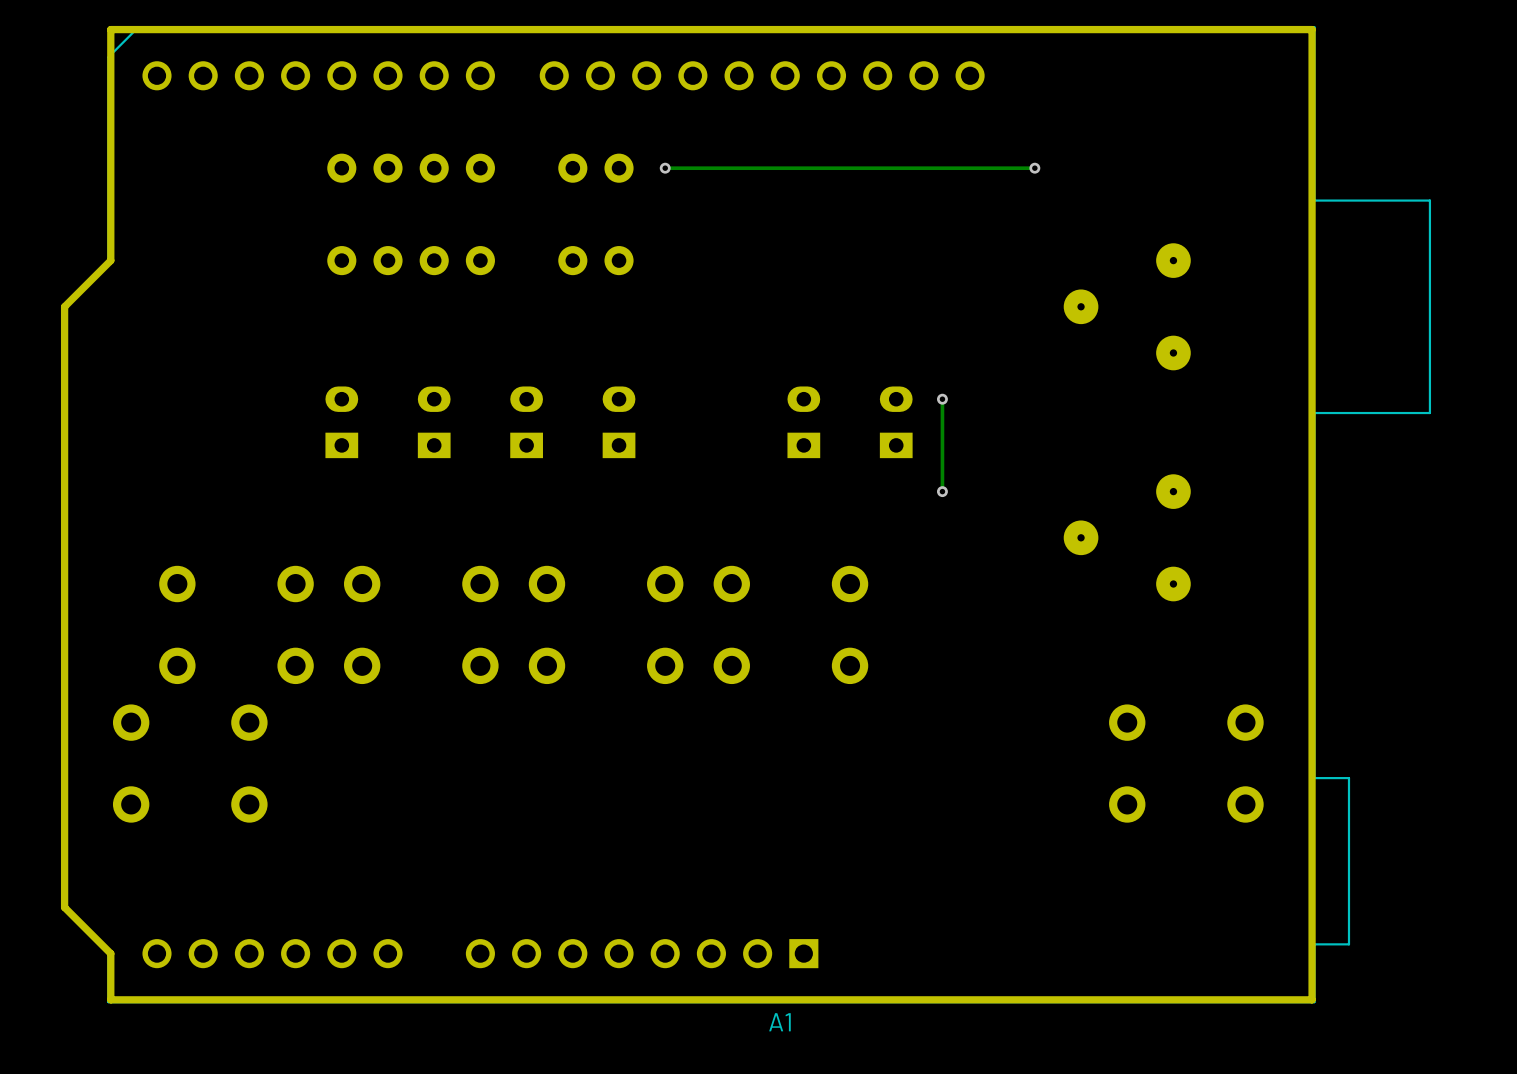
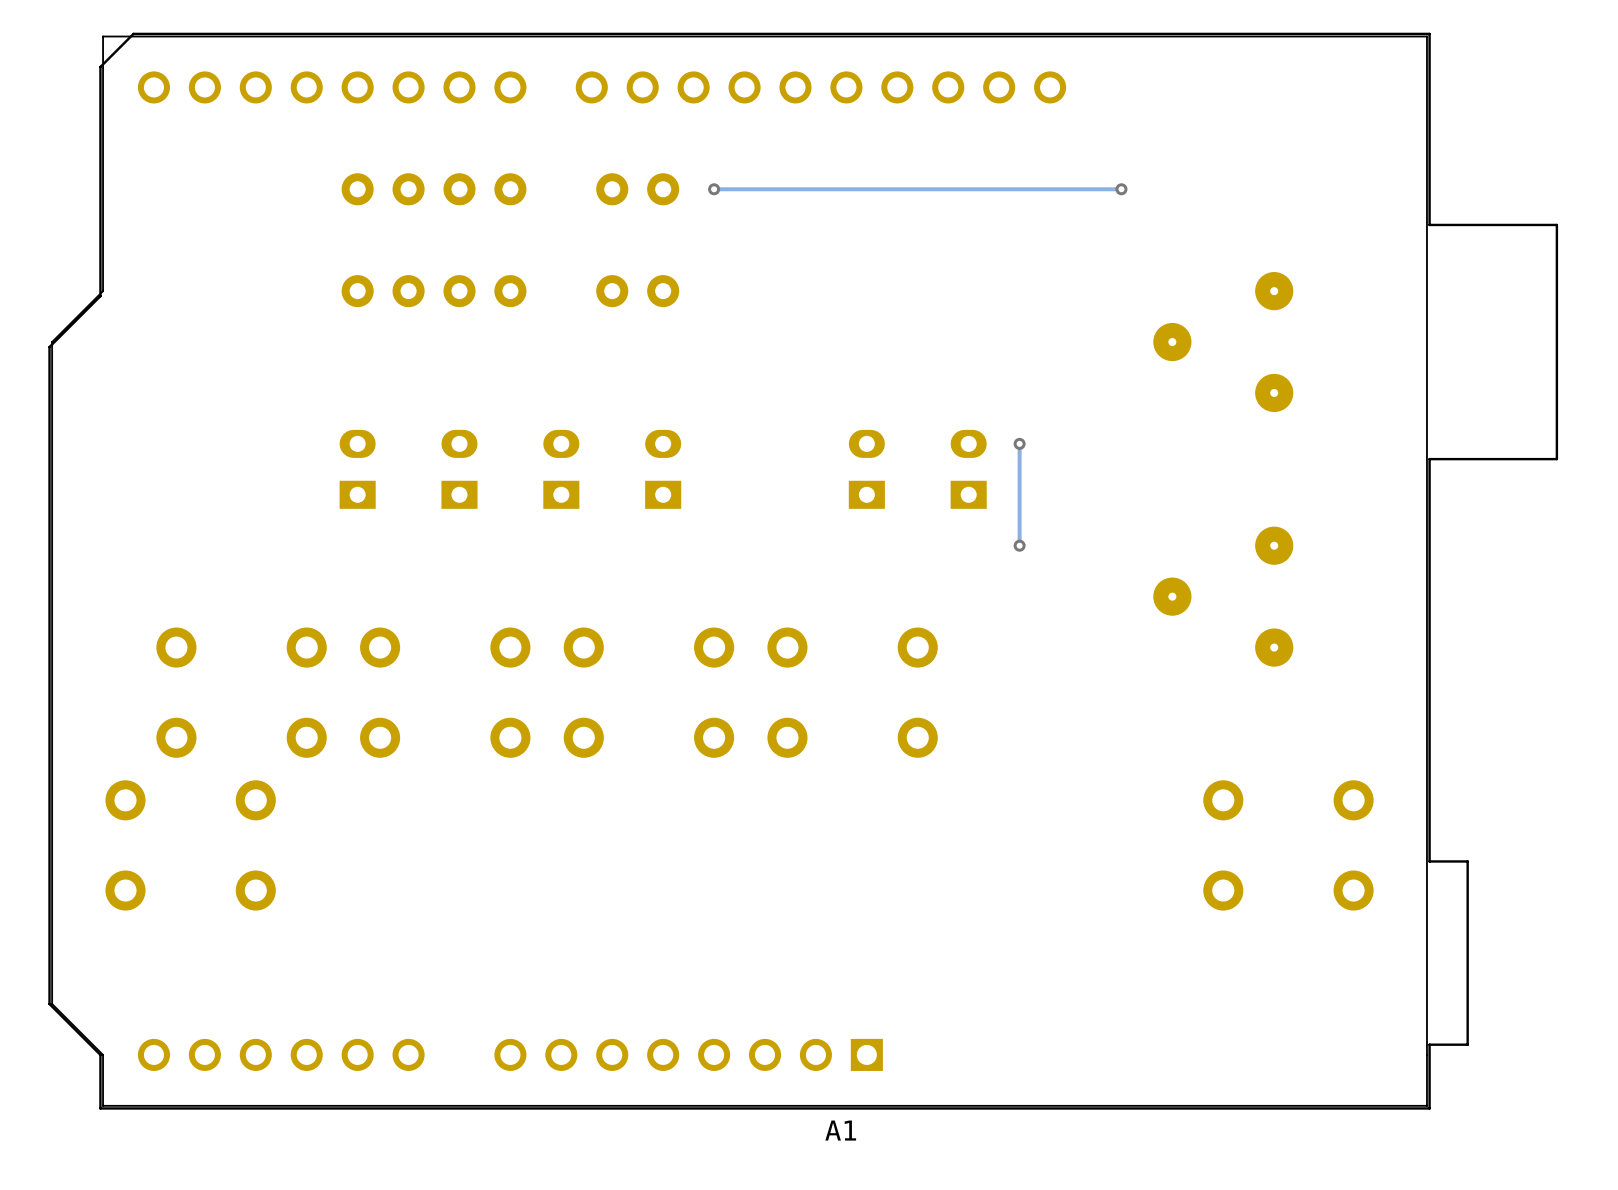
board edge width: thick (1312, 29) (1312, 999) (110, 999) (110, 953) (64, 907) (64, 306) (110, 260) (110, 29) (1312, 29) -> thin (1426, 36) (1426, 1105) (103, 1105) (103, 1054) (52, 1004) (52, 342) (103, 291) (103, 36) (1426, 36)

